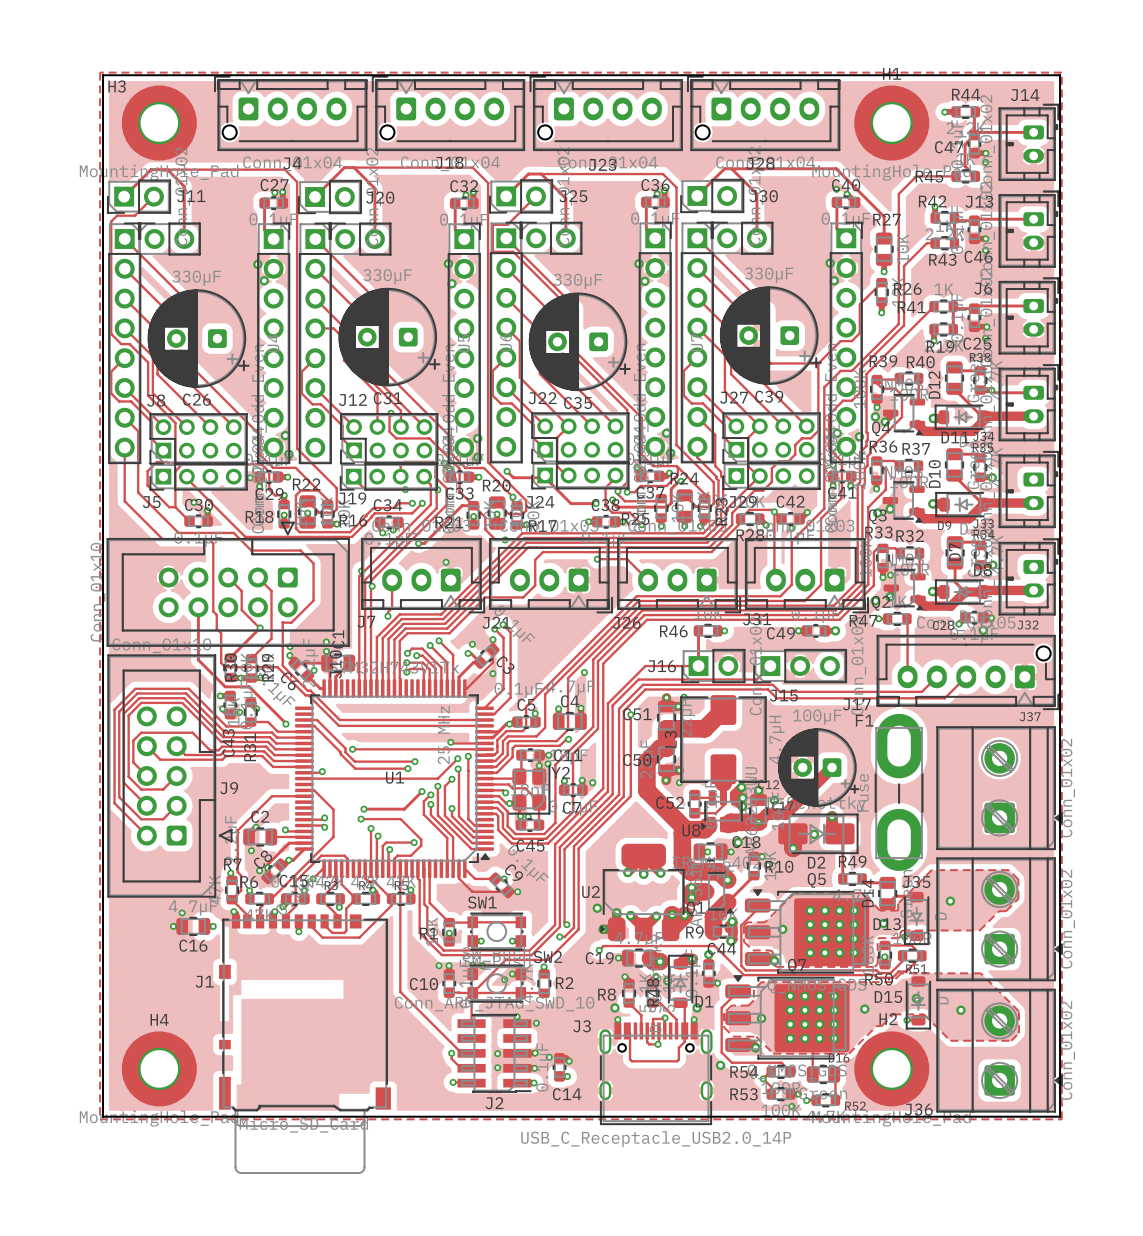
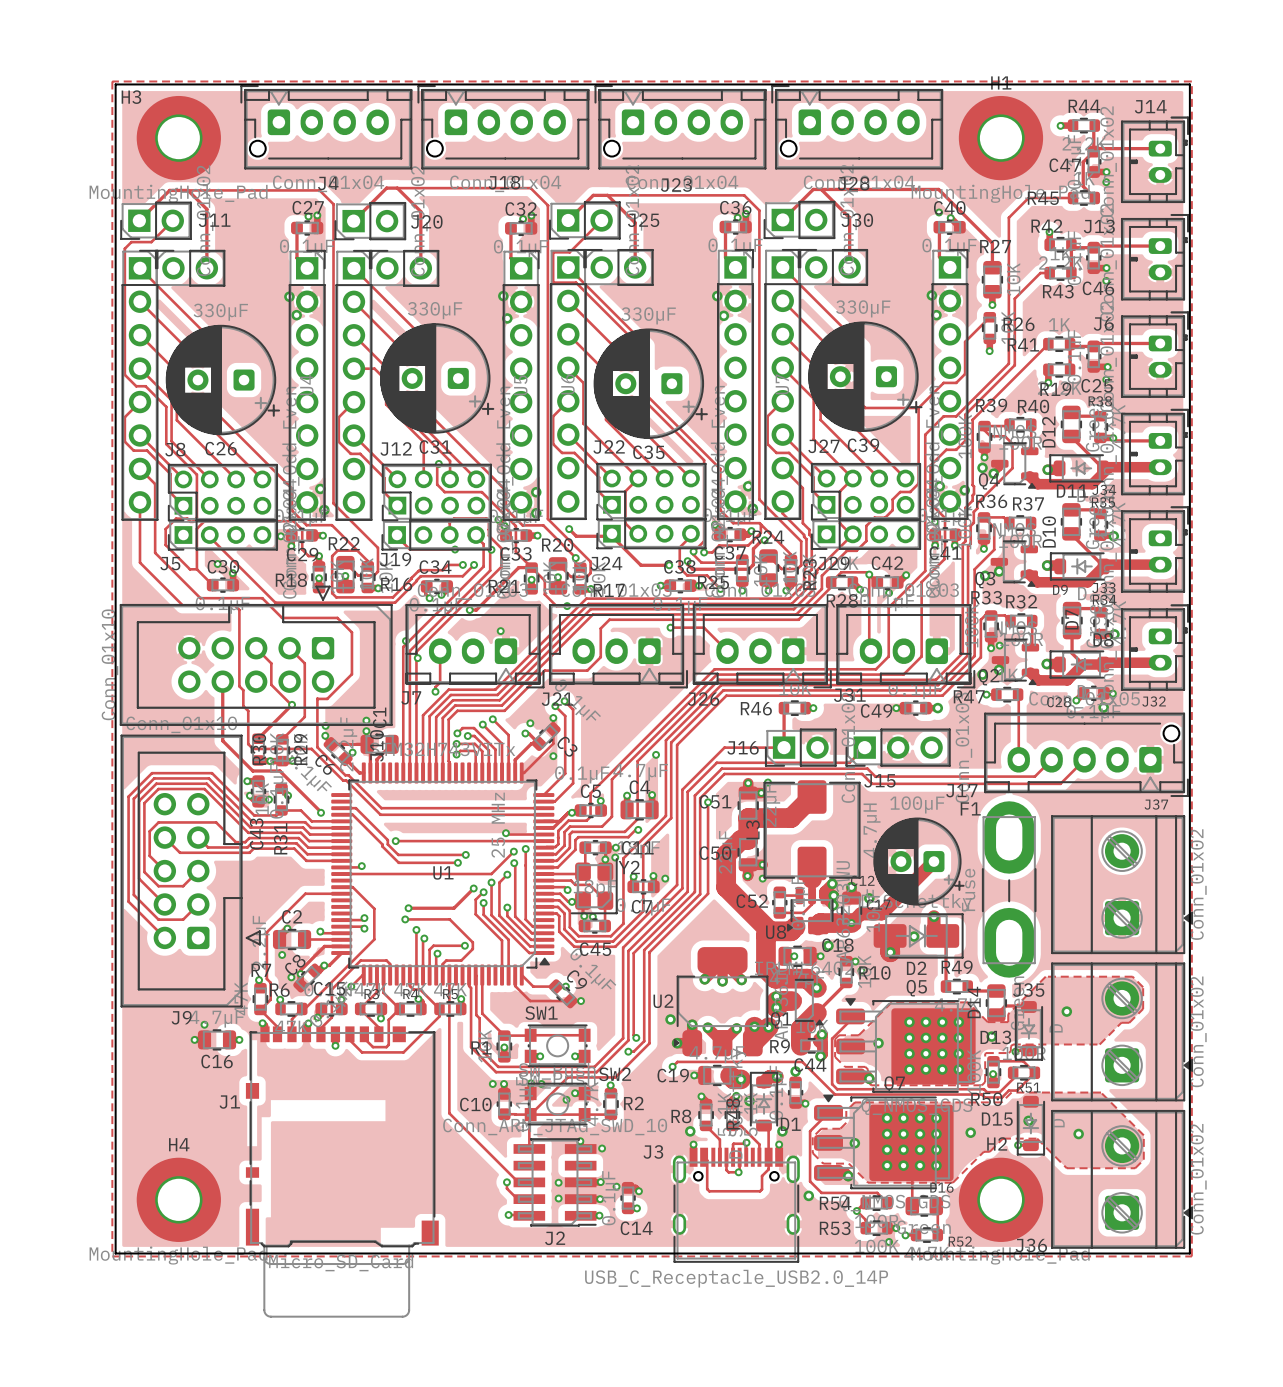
J9 name position: J9 (229, 788) -> J9 (181, 1017)

